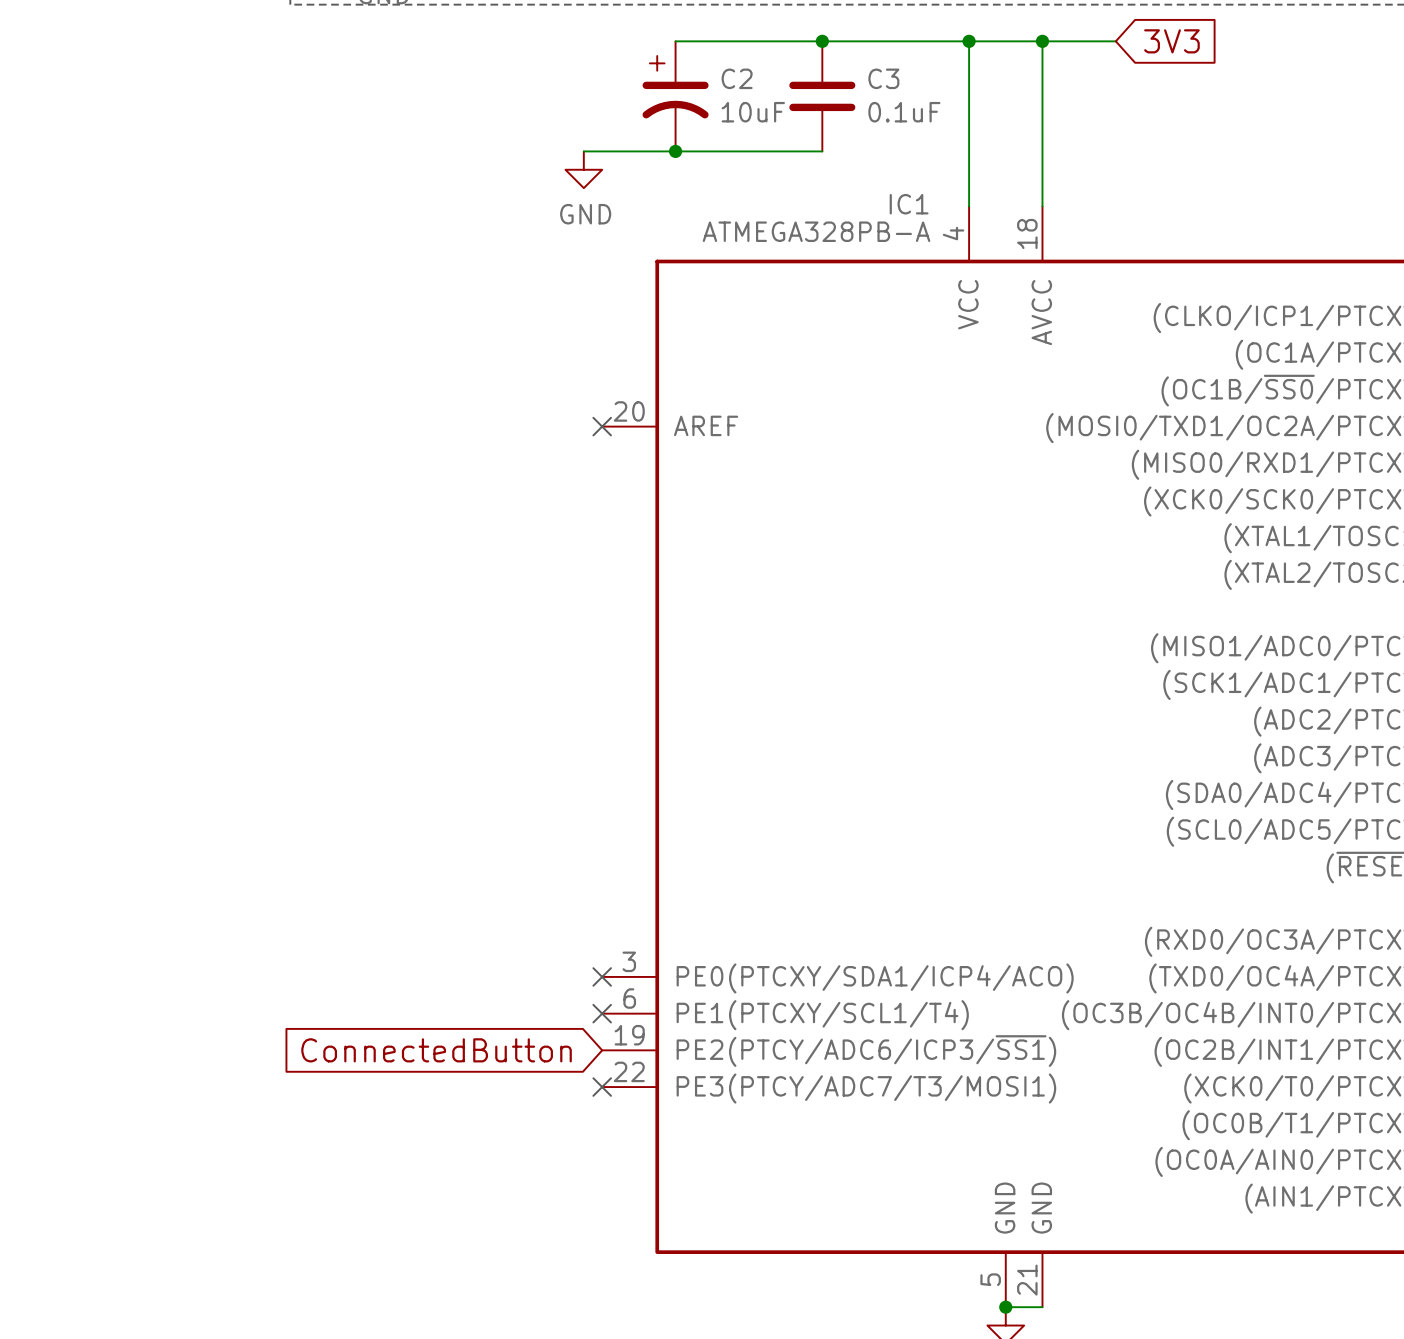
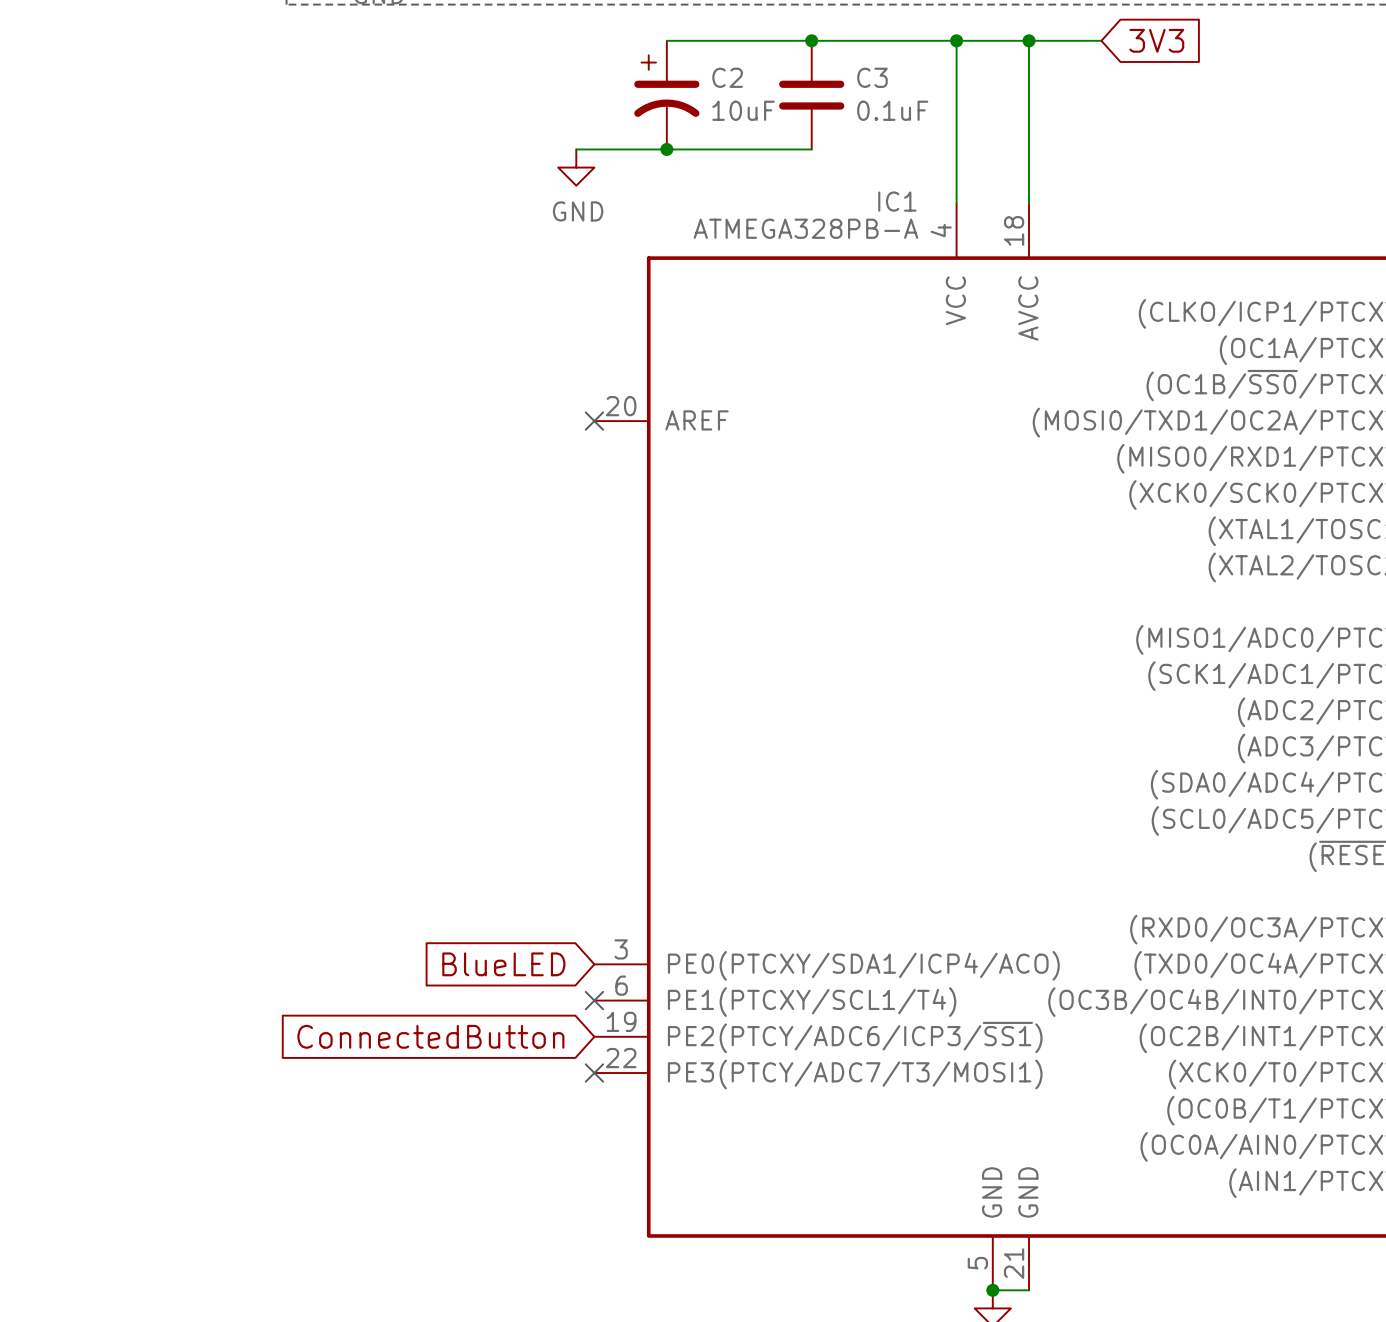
global label: none -> BlueLED (503, 964)
no-connect mark: (602, 976) -> none

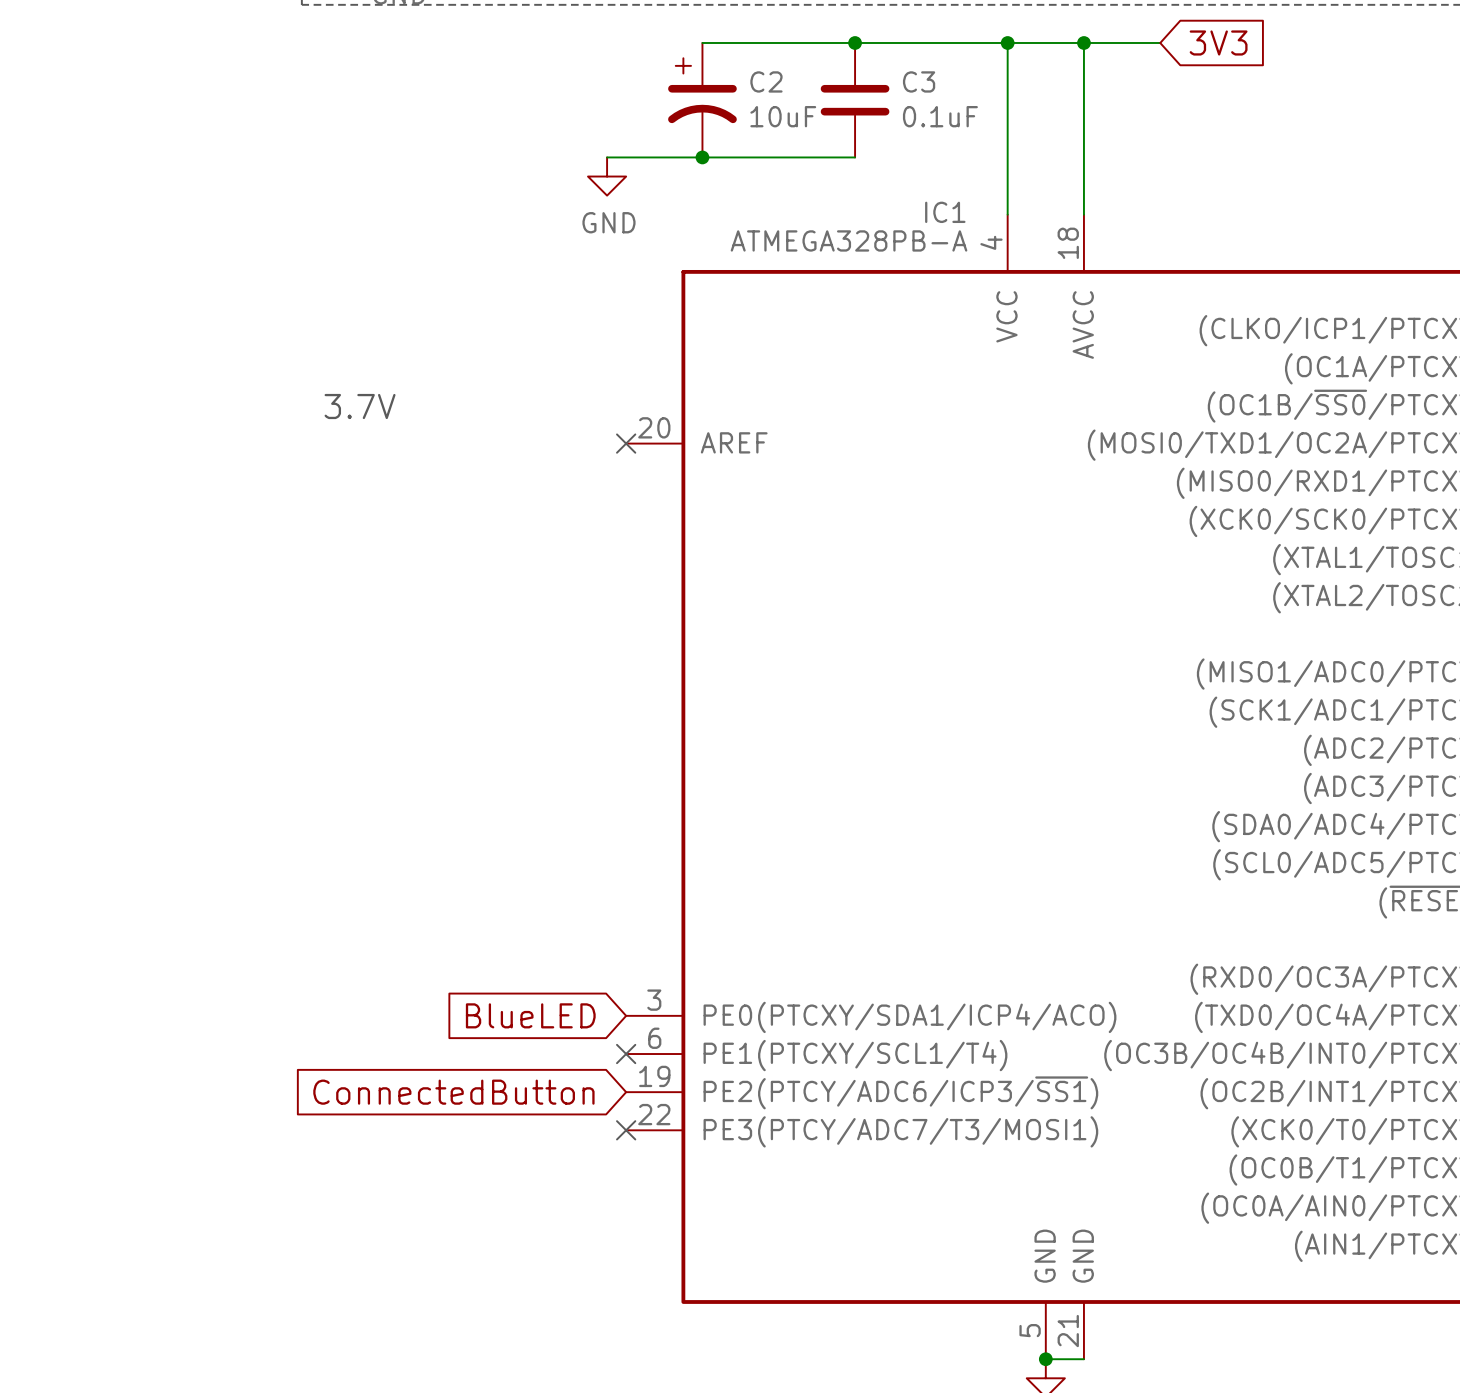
text: none -> 3.7V (360, 406)

